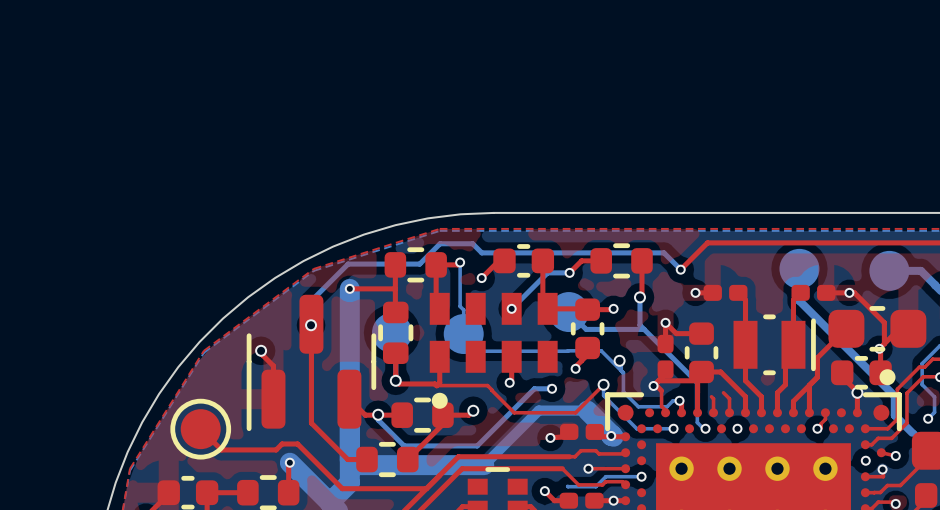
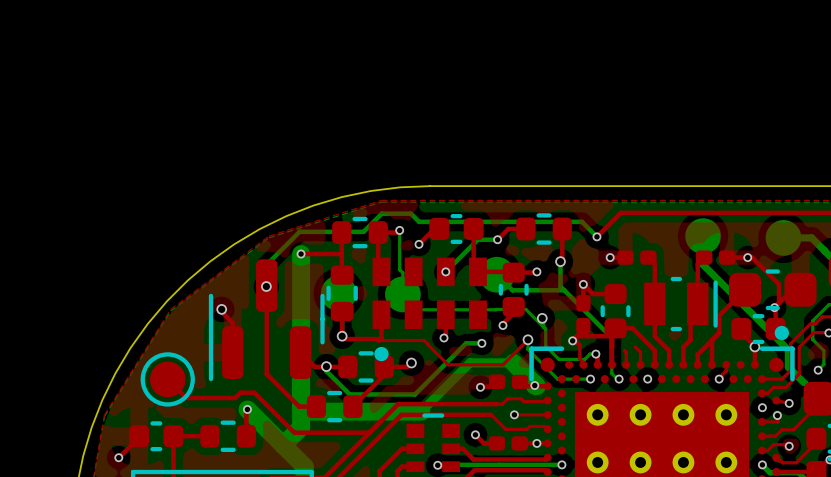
bottom track: (641, 476) (605, 476) (595, 486) (568, 486) -> none
via: (641, 476) -> none

